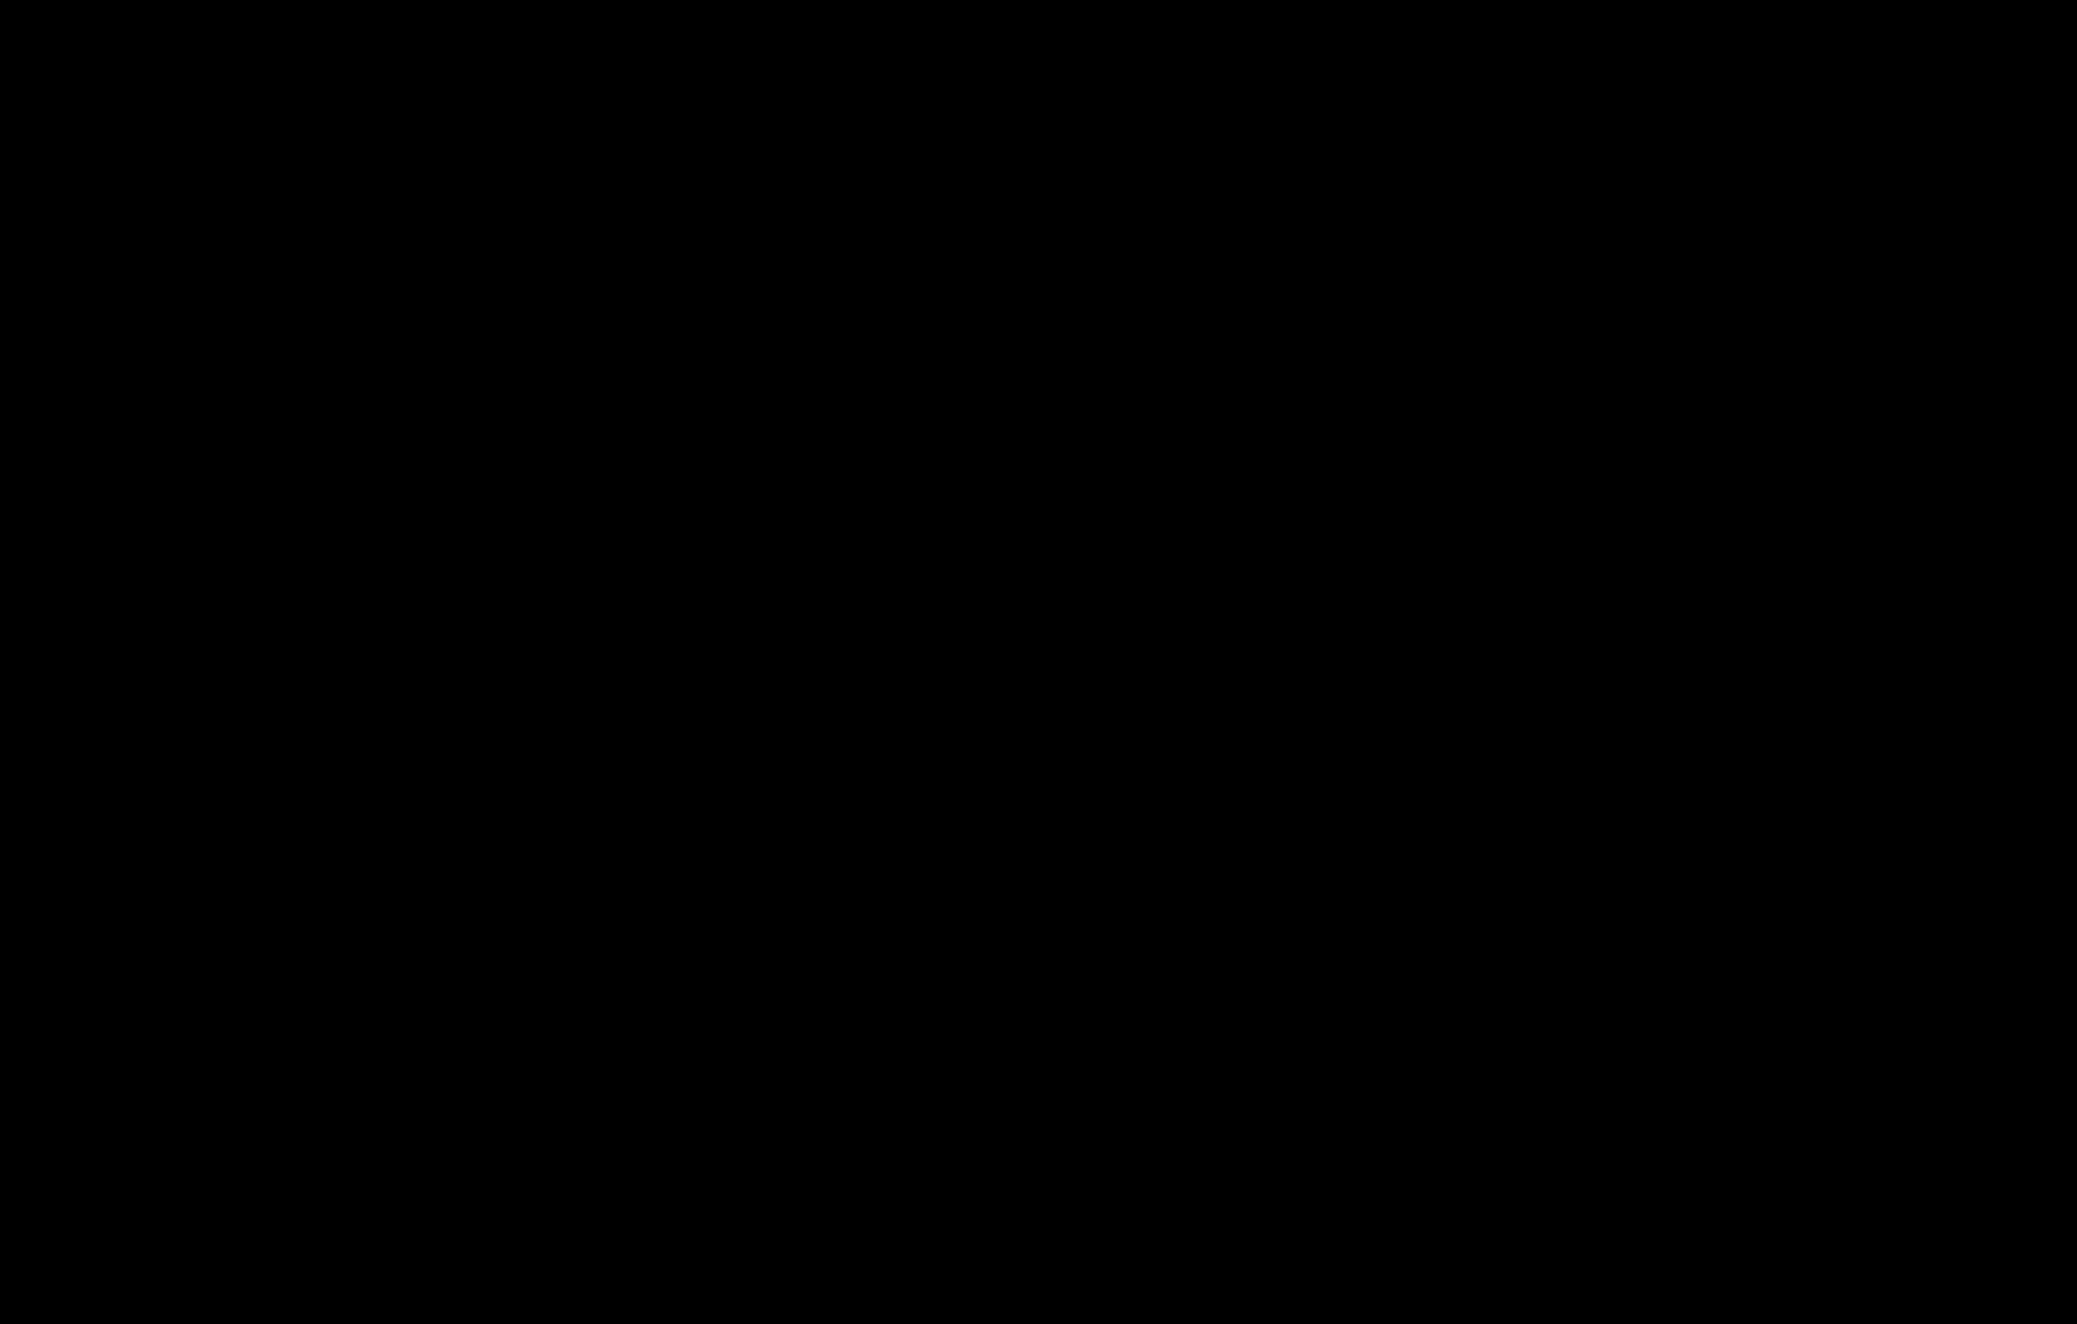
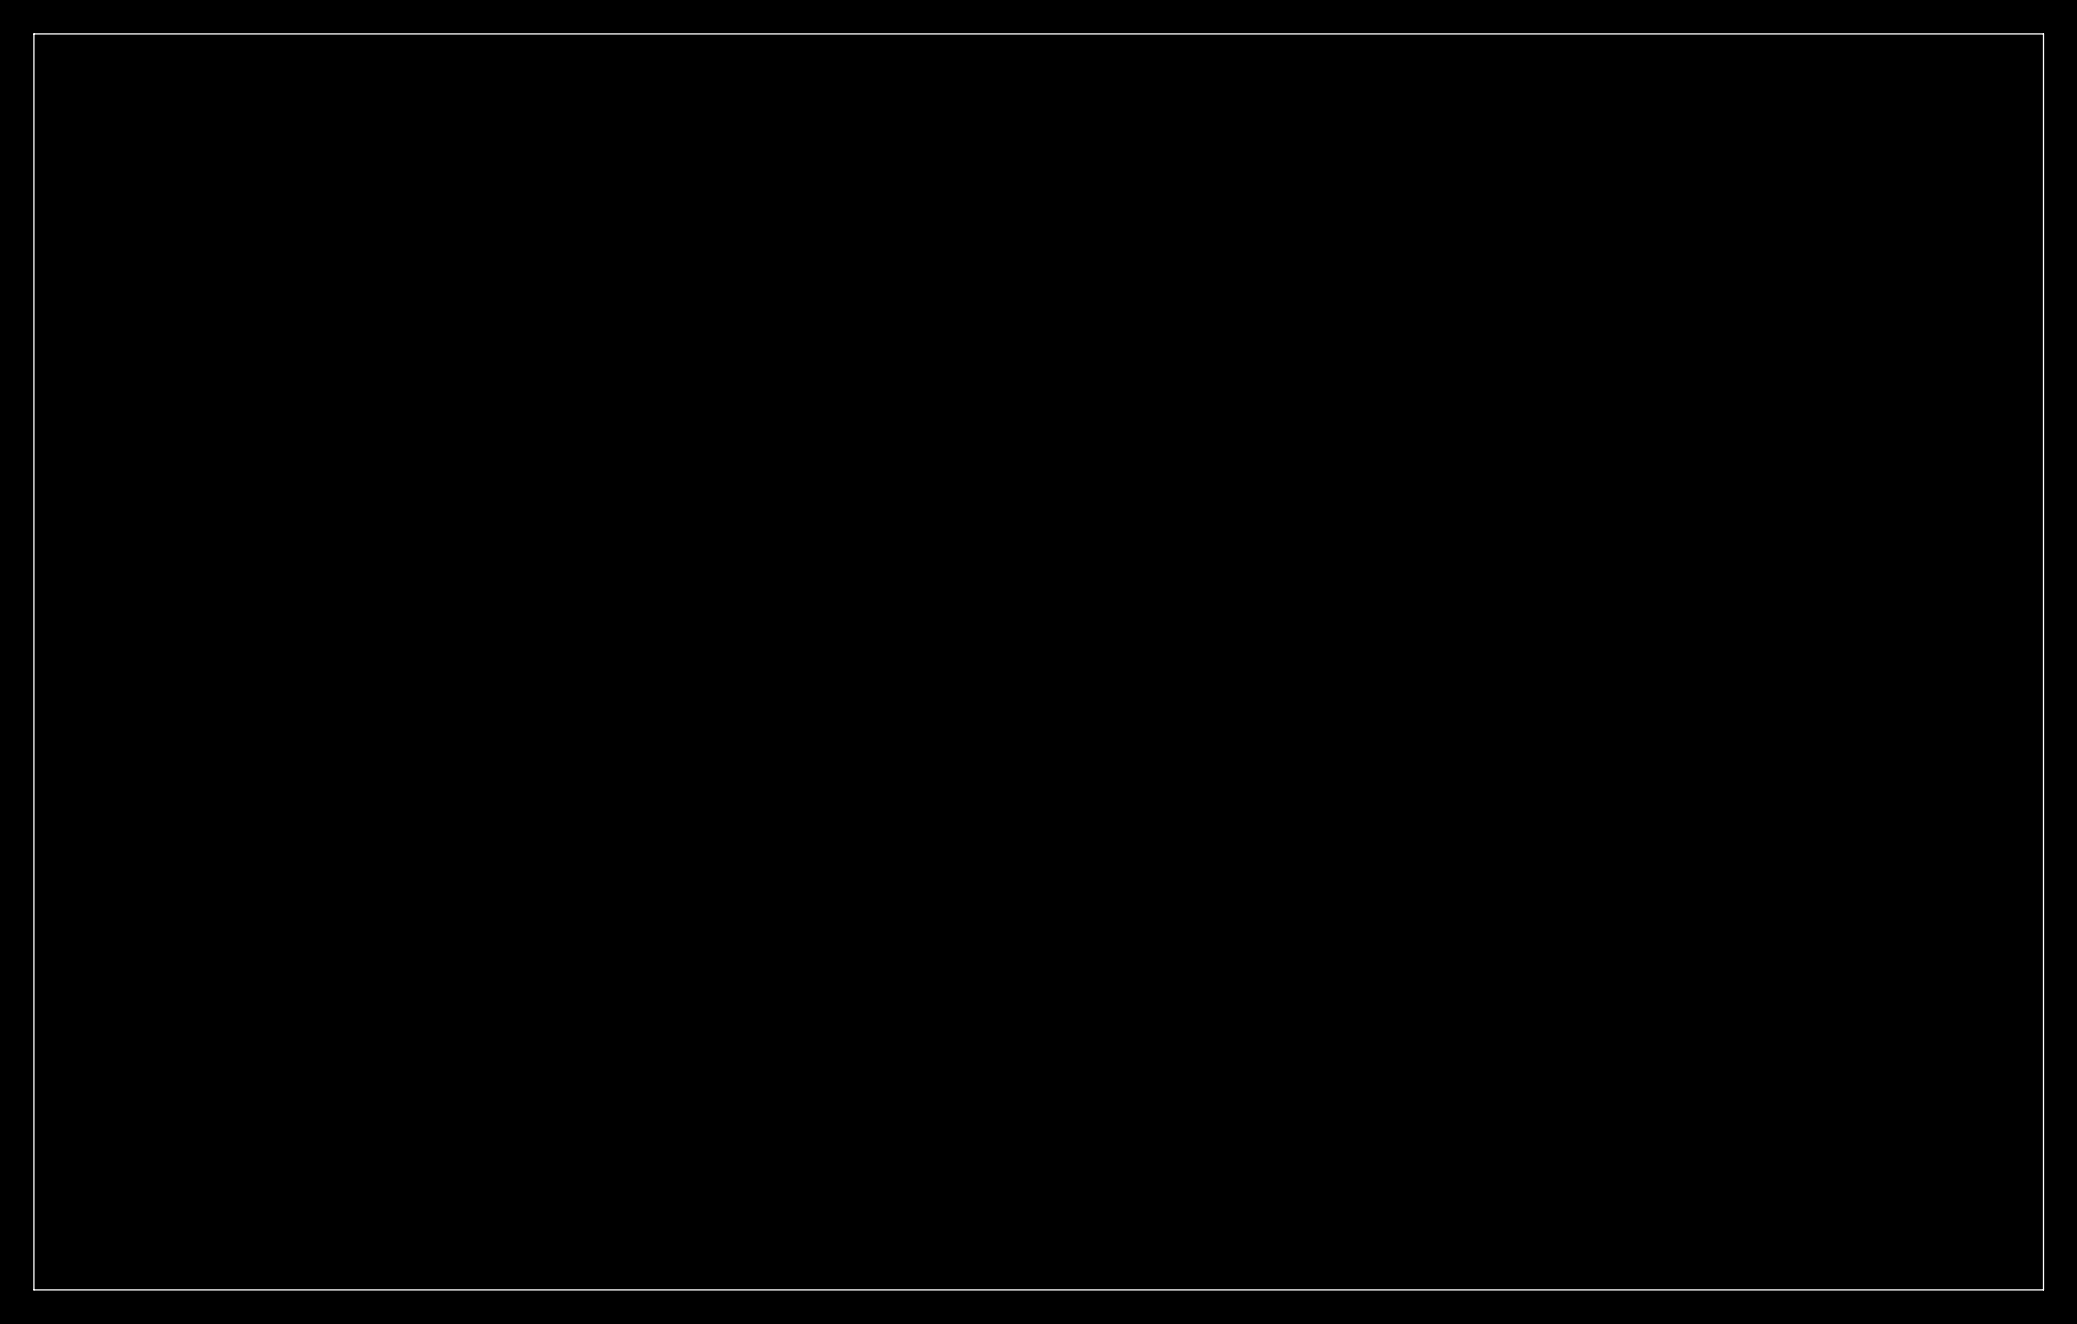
board edge: none -> (33, 33) (2043, 33) (2043, 1289) (33, 1289) (33, 33)

